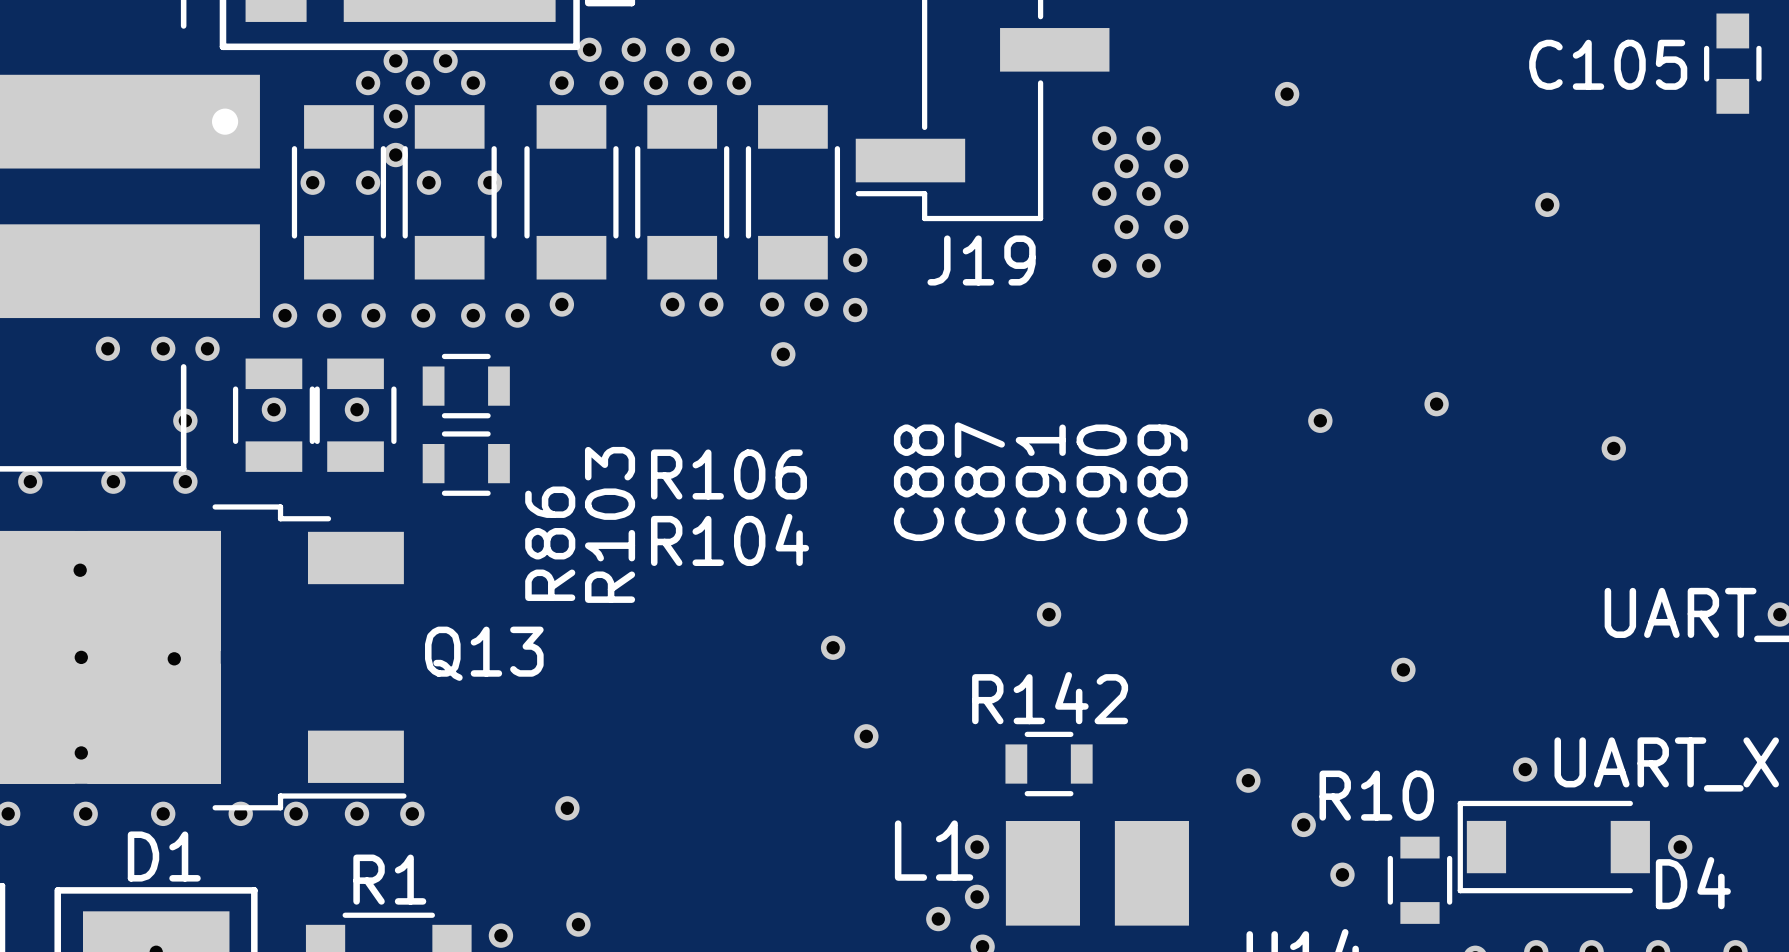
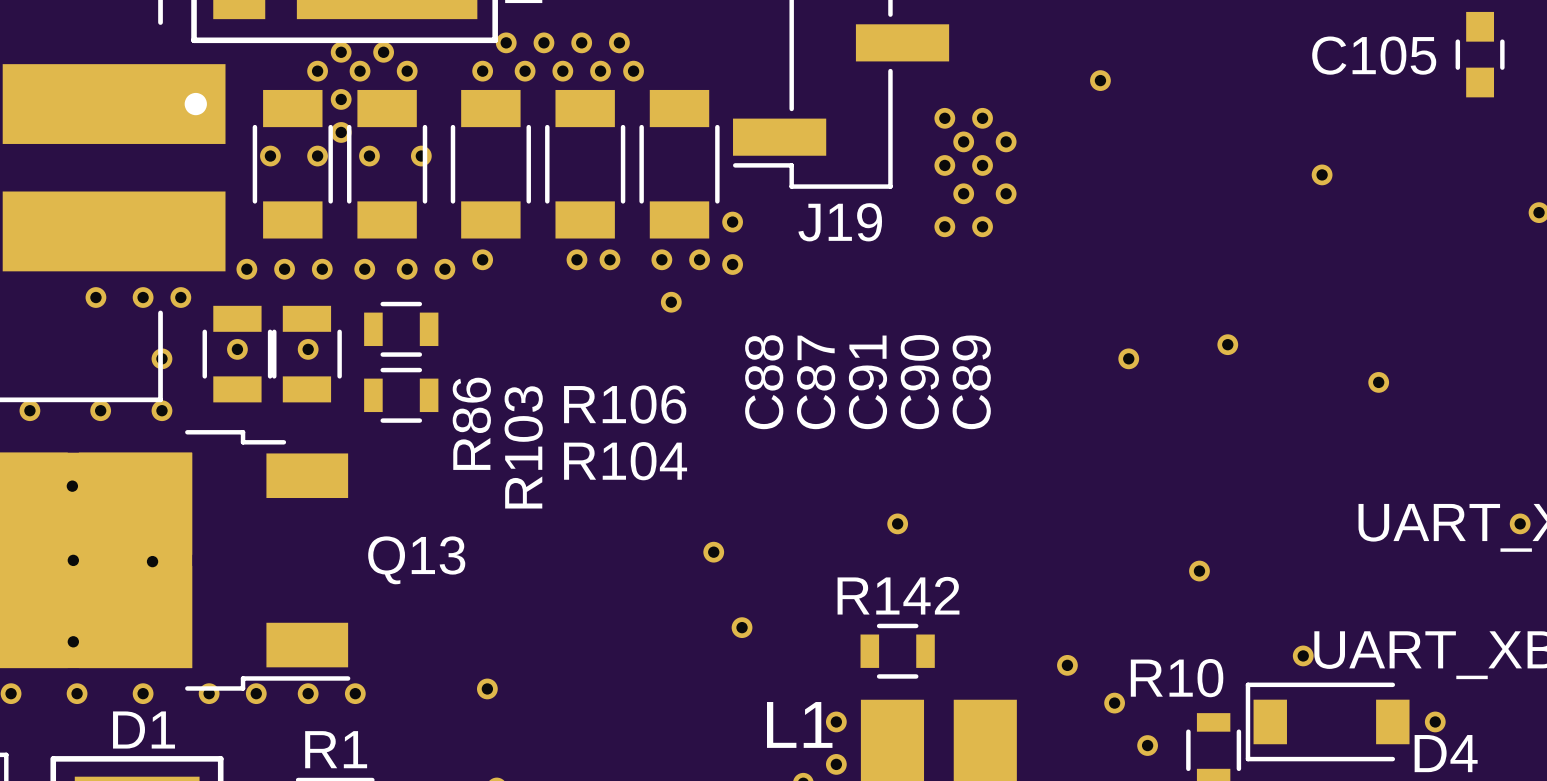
C87 name position: C87 (979, 481) -> C87 (816, 382)
C88 name position: C88 (918, 482) -> C88 (764, 382)
C91 name position: C91 (1040, 482) -> C91 (867, 382)
C90 name position: C90 (1101, 482) -> C90 (919, 382)
C89 name position: C89 (1162, 482) -> C89 (971, 382)
R86 name position: R86 (550, 543) -> R86 (471, 423)

